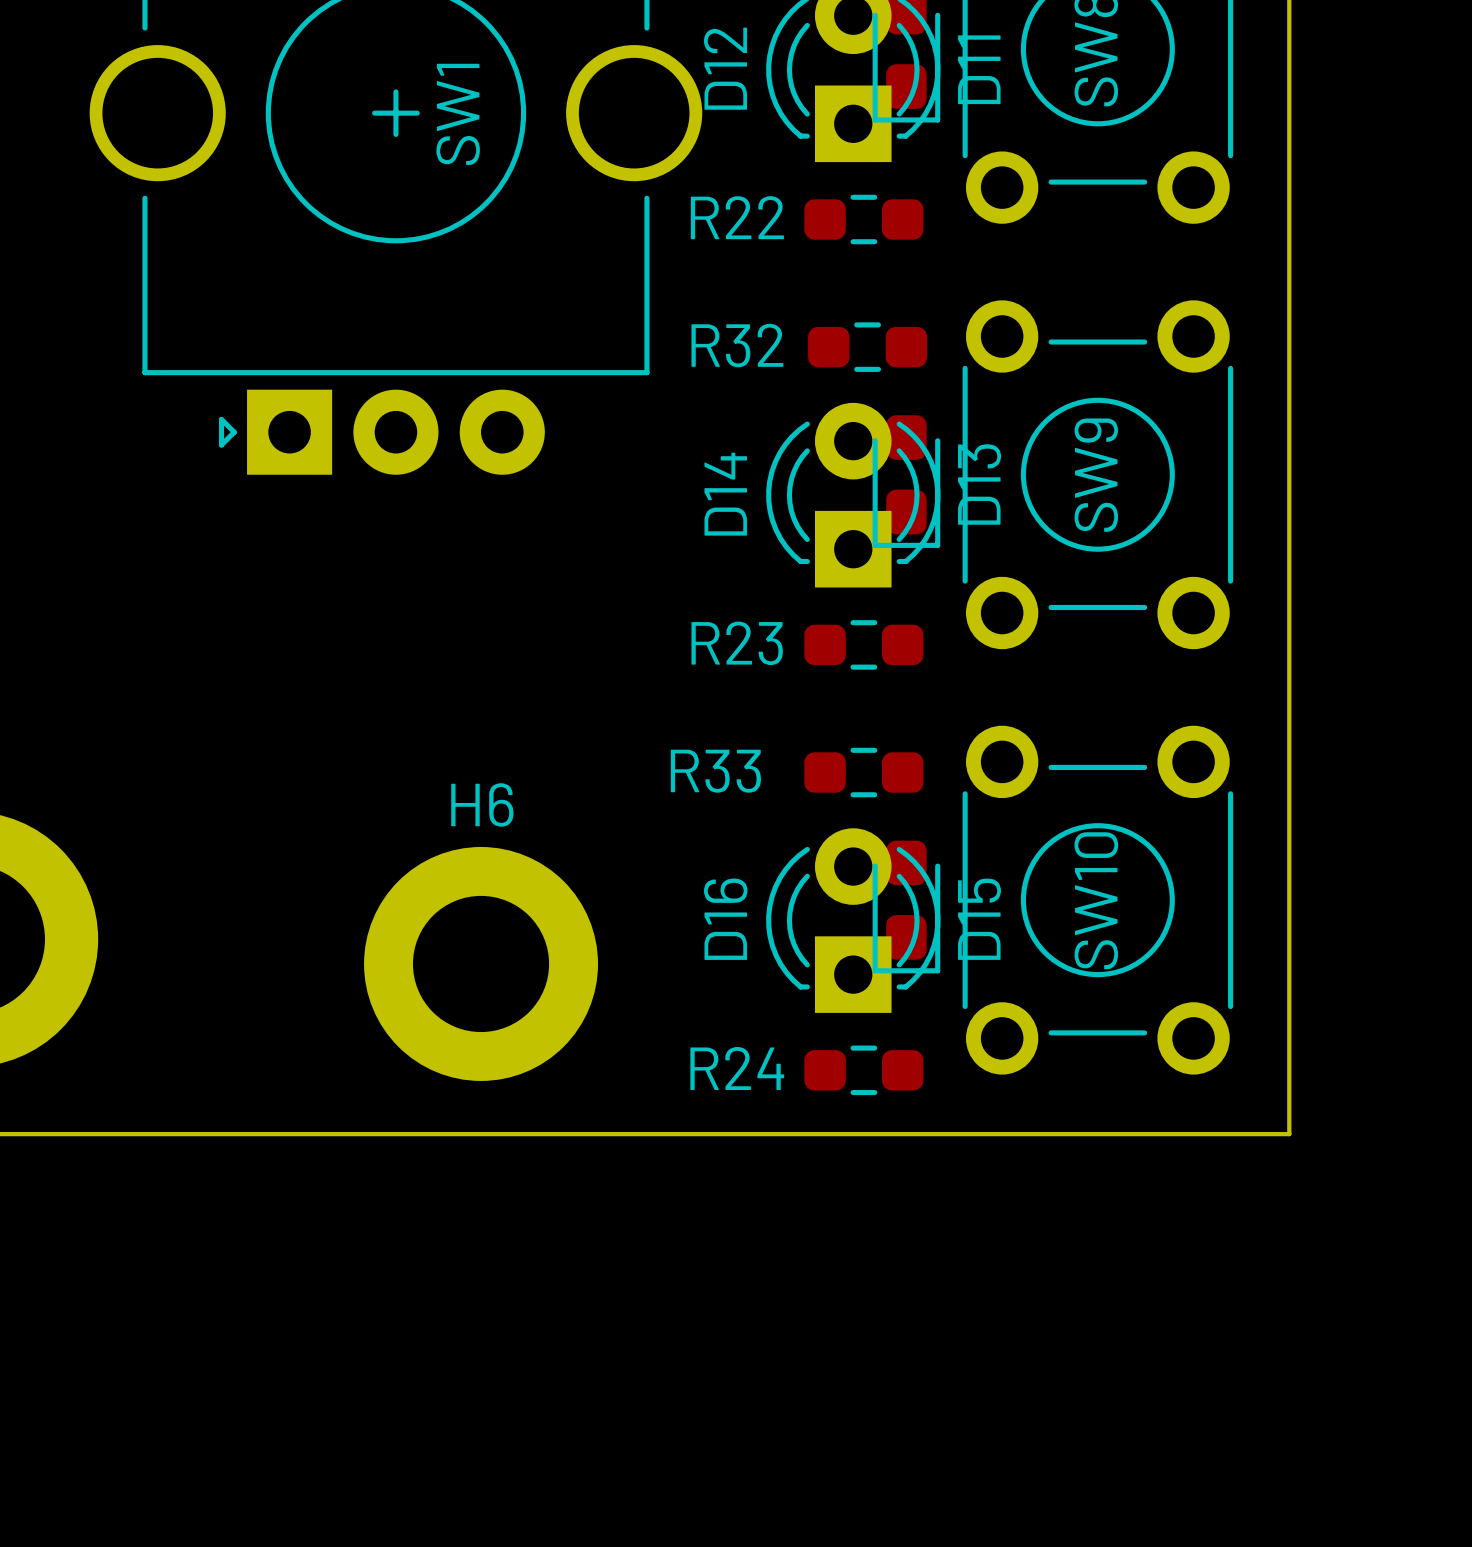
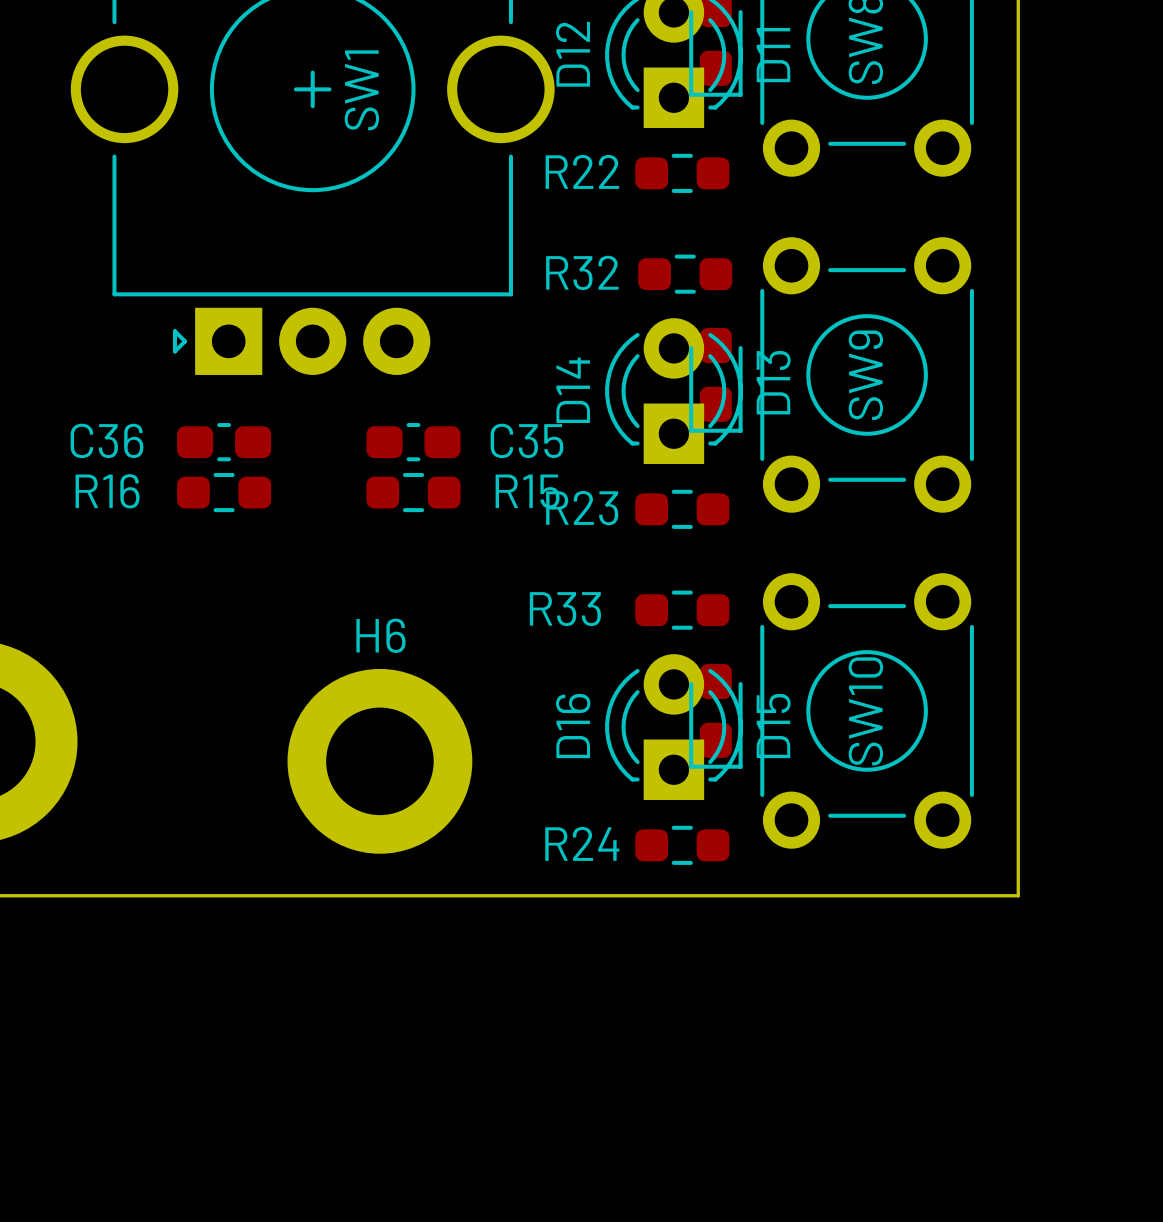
C36: none -> (224, 442)
C35: none -> (413, 442)
R16: none -> (224, 492)
R15: none -> (413, 492)

